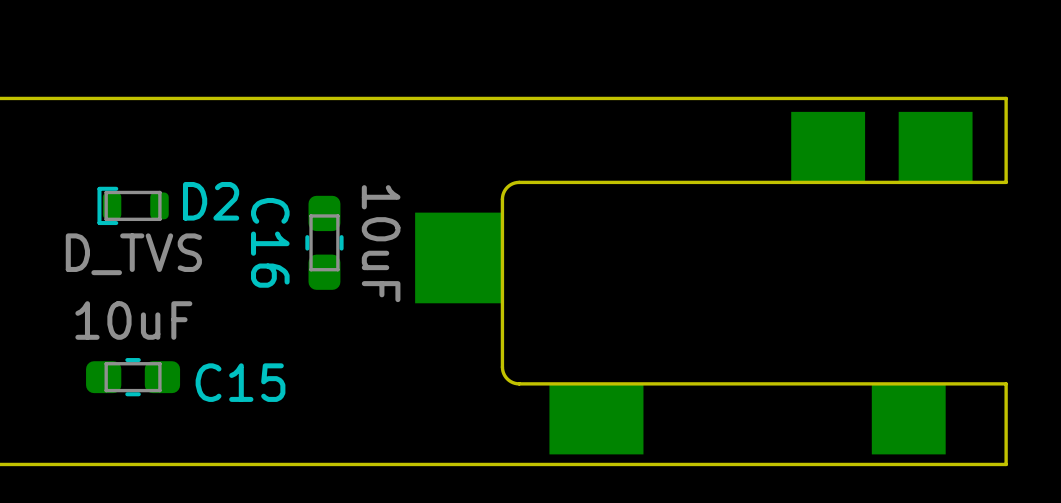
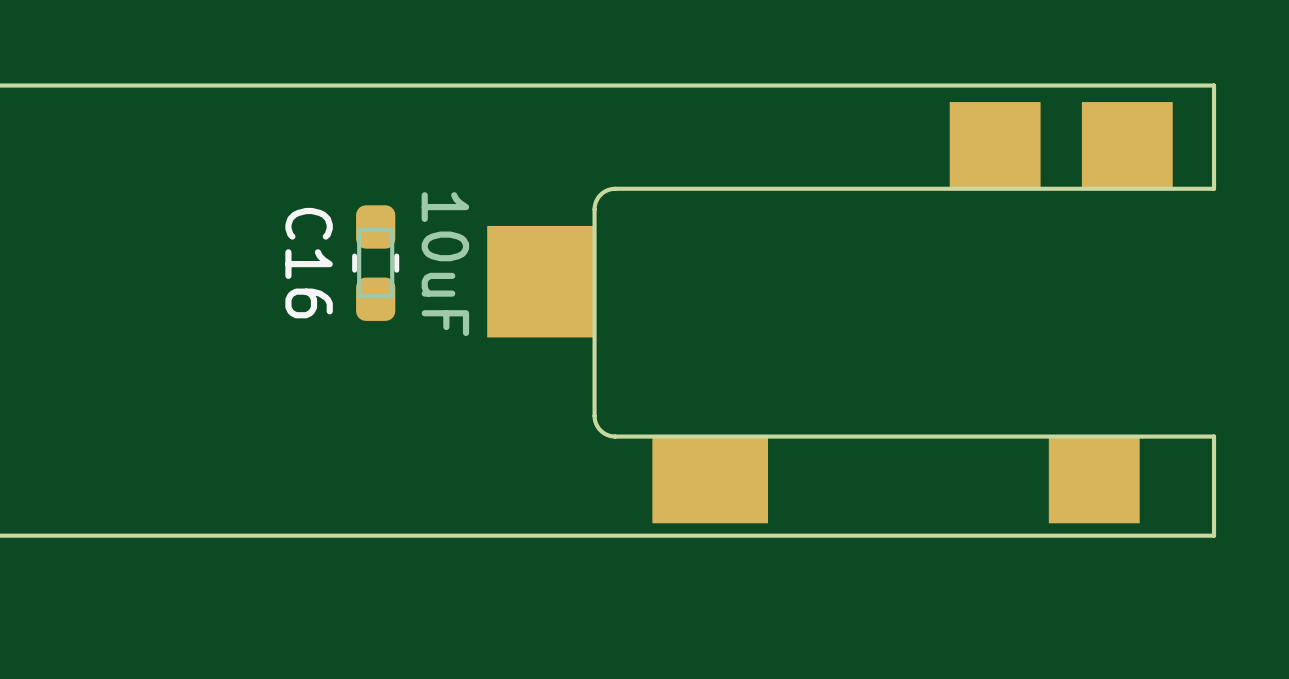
D2: D_TVS (133, 205) -> none
C15: 10uF (133, 377) -> none

